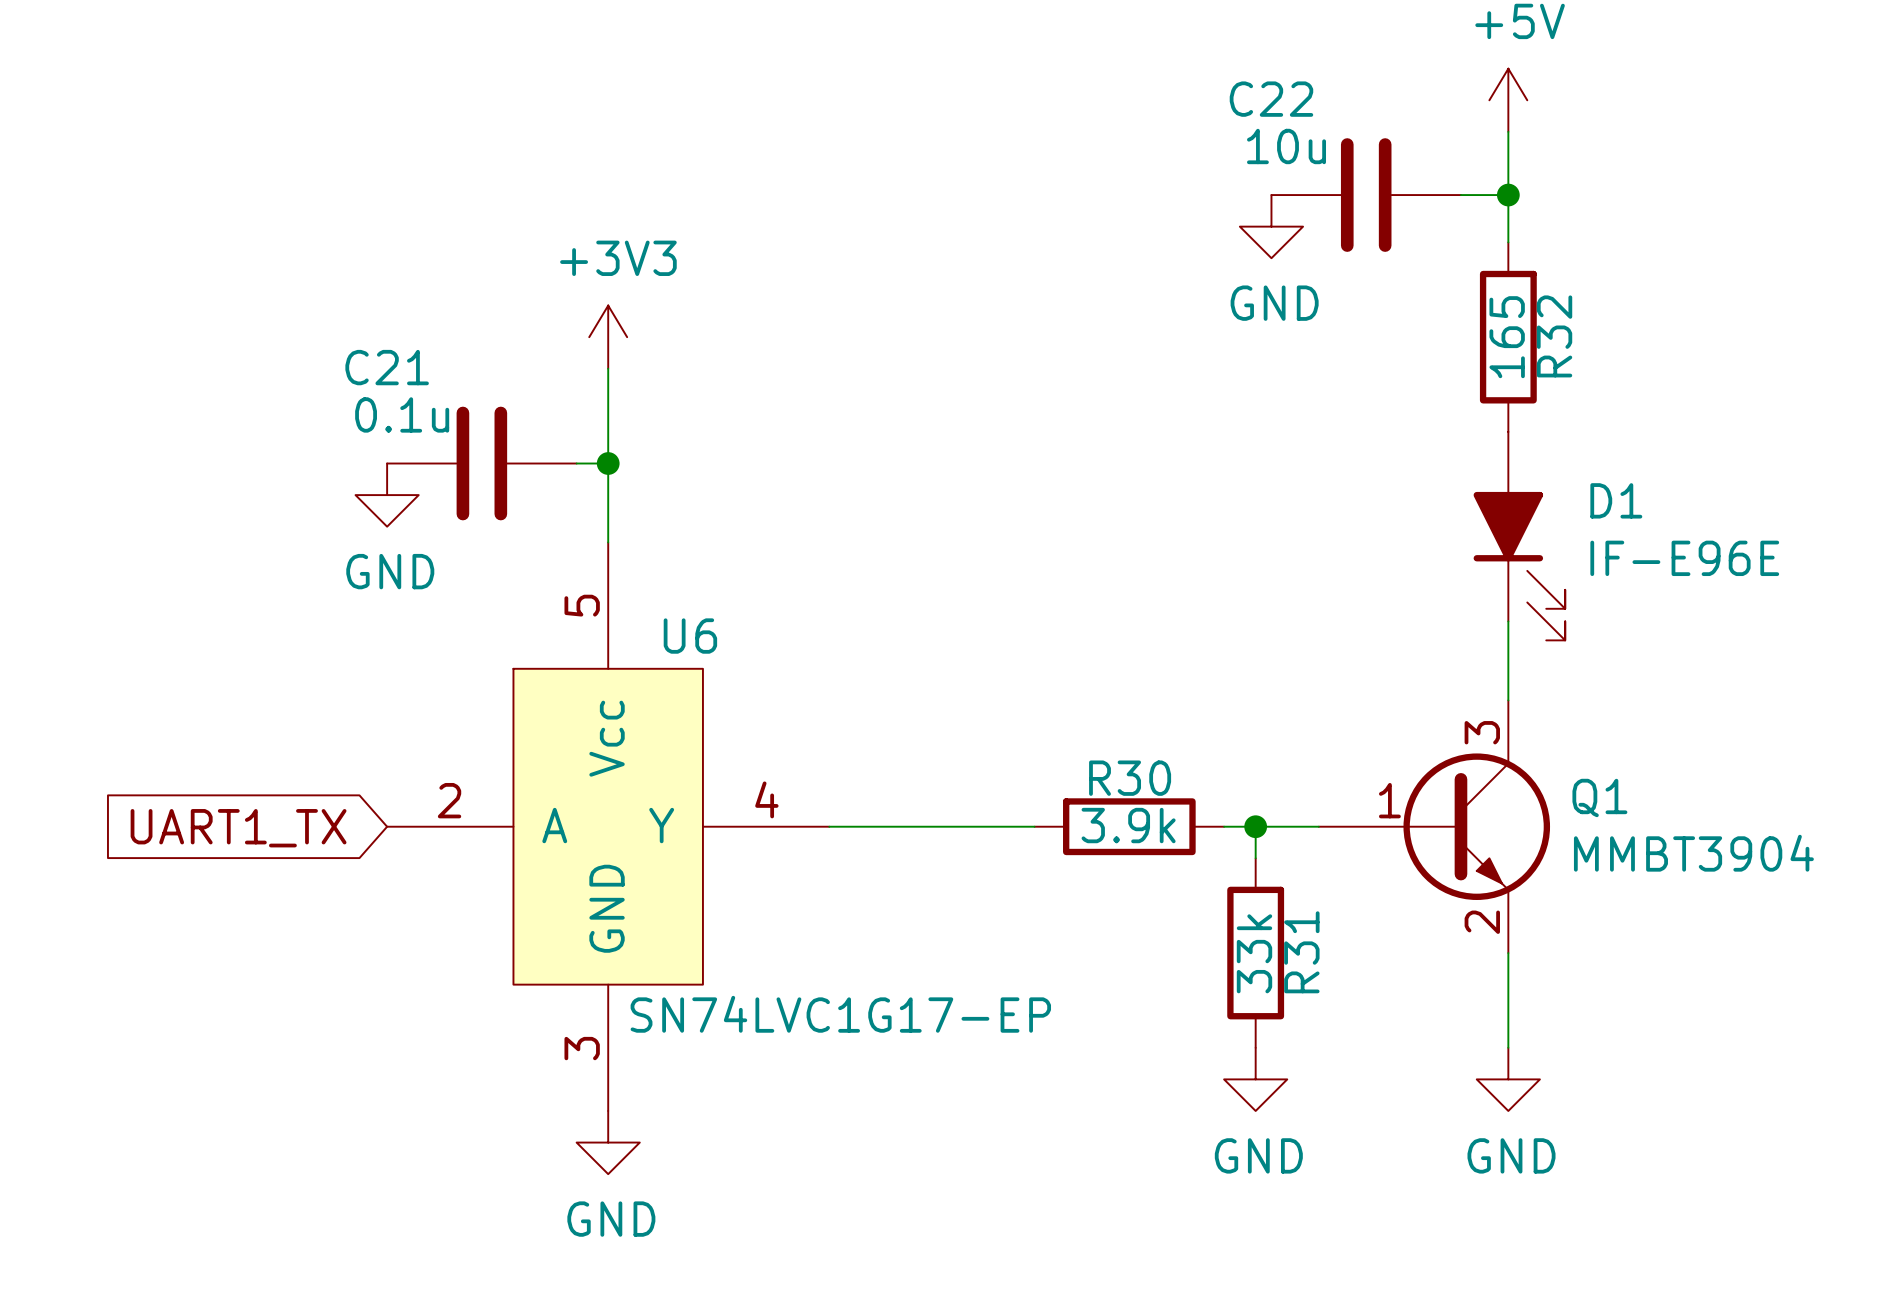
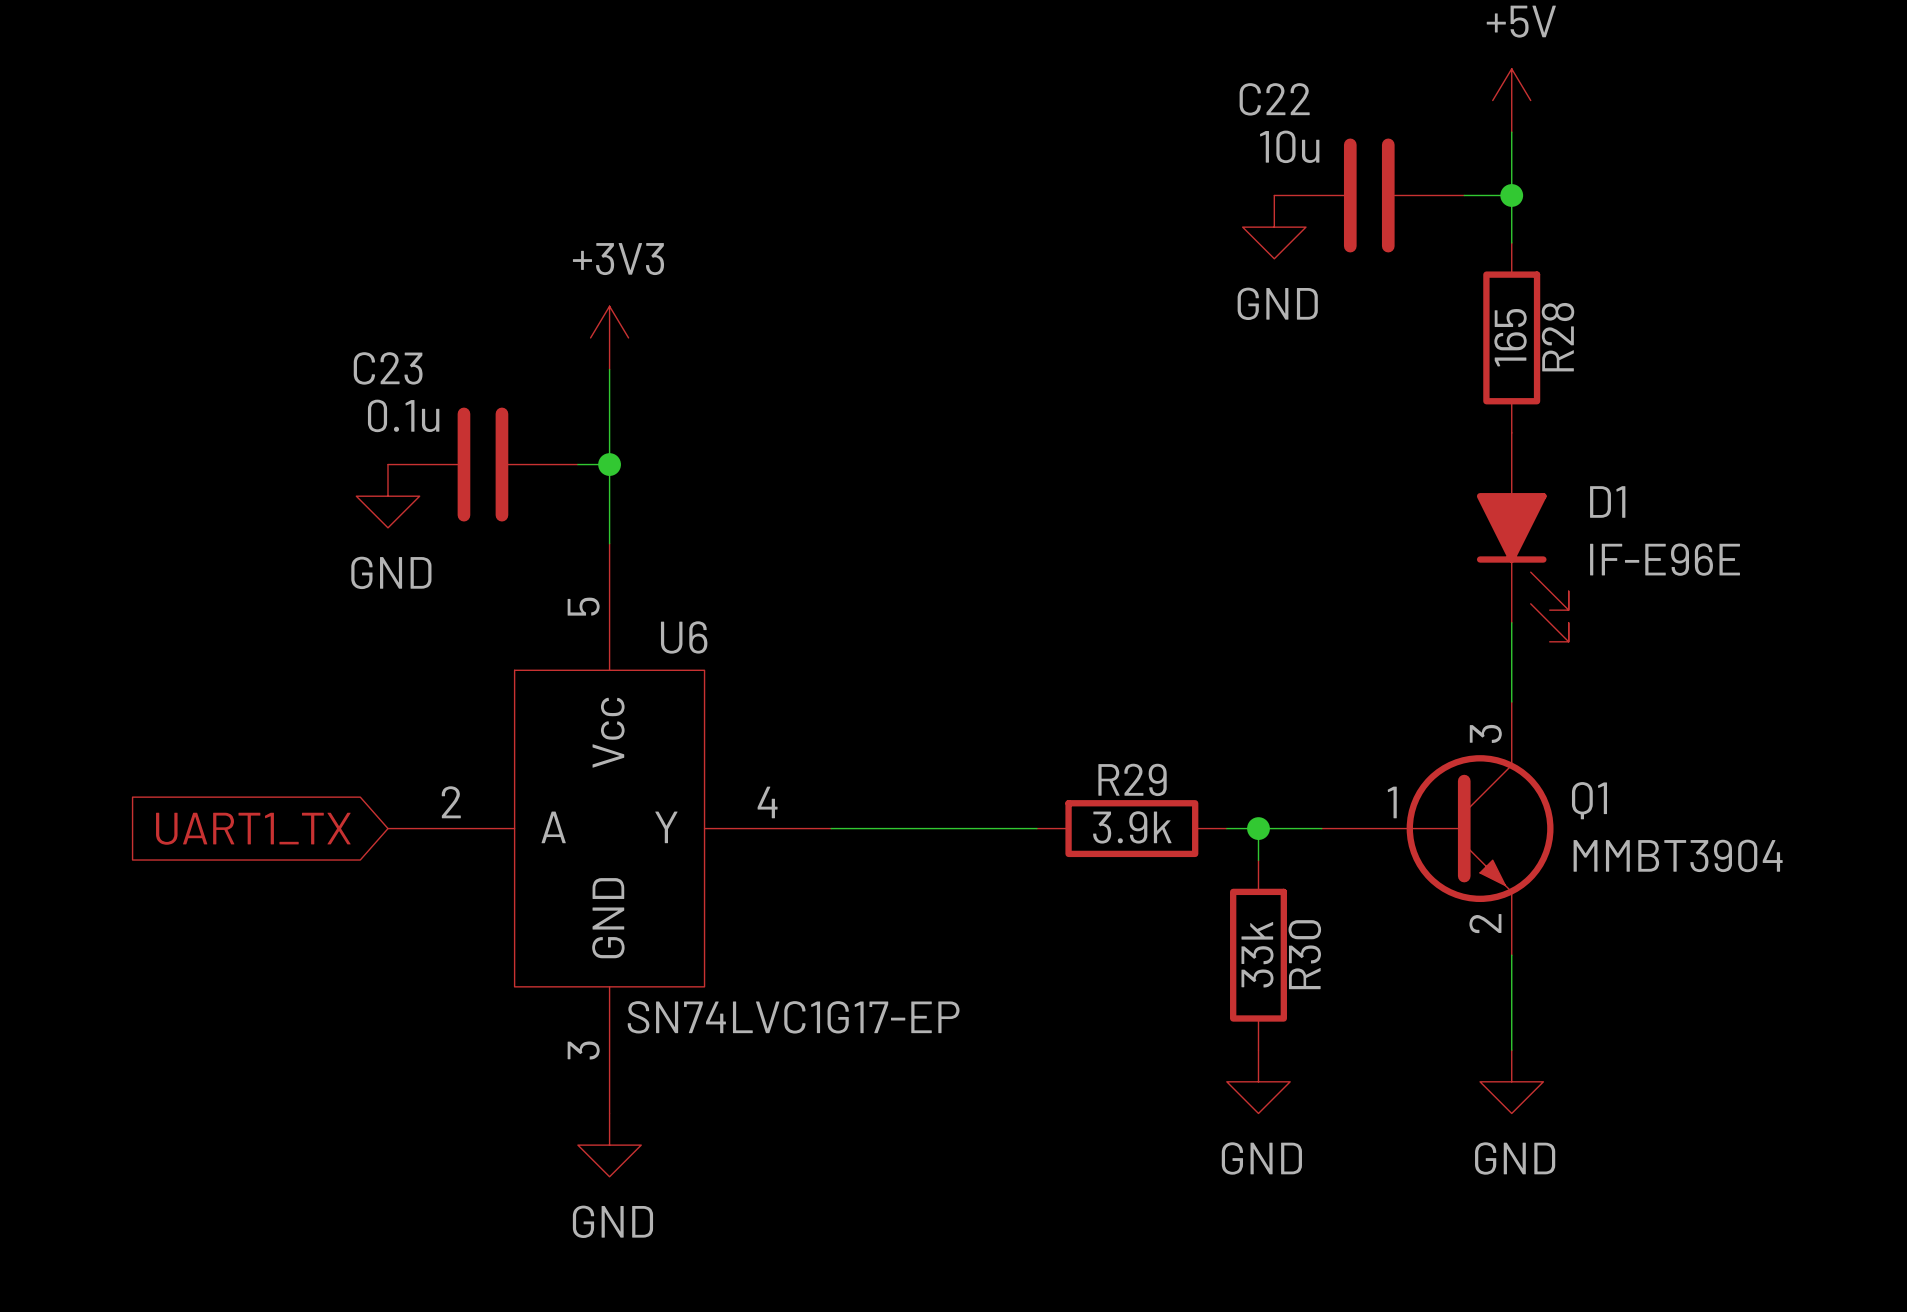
R32 name: R32 (1554, 336) -> R28 (1557, 337)
C21 name: C21 (387, 367) -> C23 (388, 368)
R30 name: R30 (1130, 778) -> R29 (1132, 779)
R31 name: R31 (1301, 952) -> R30 (1304, 954)

